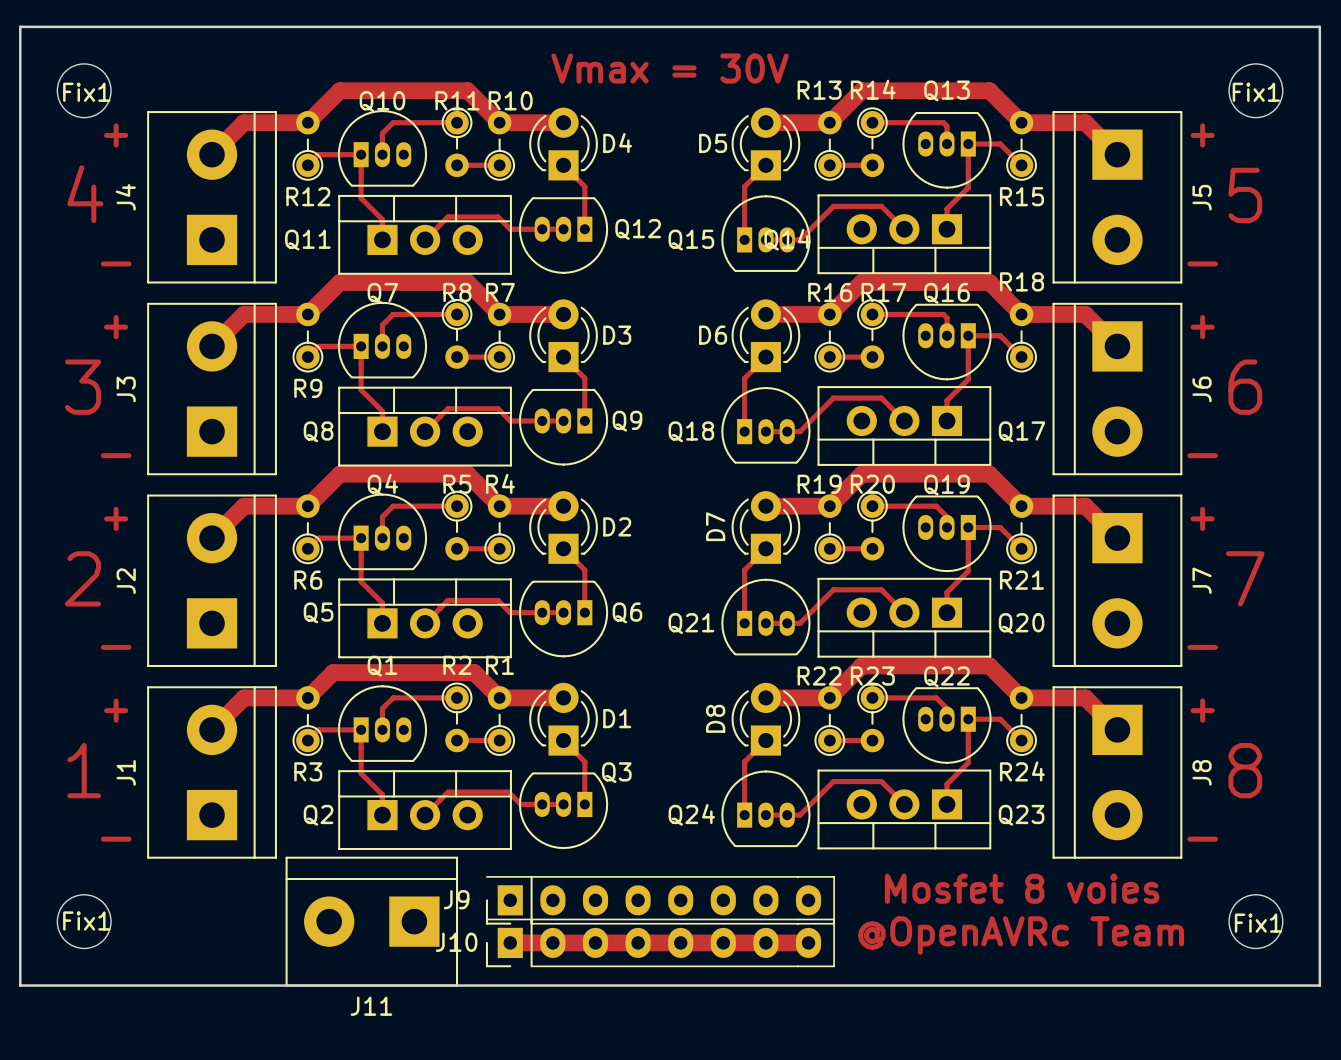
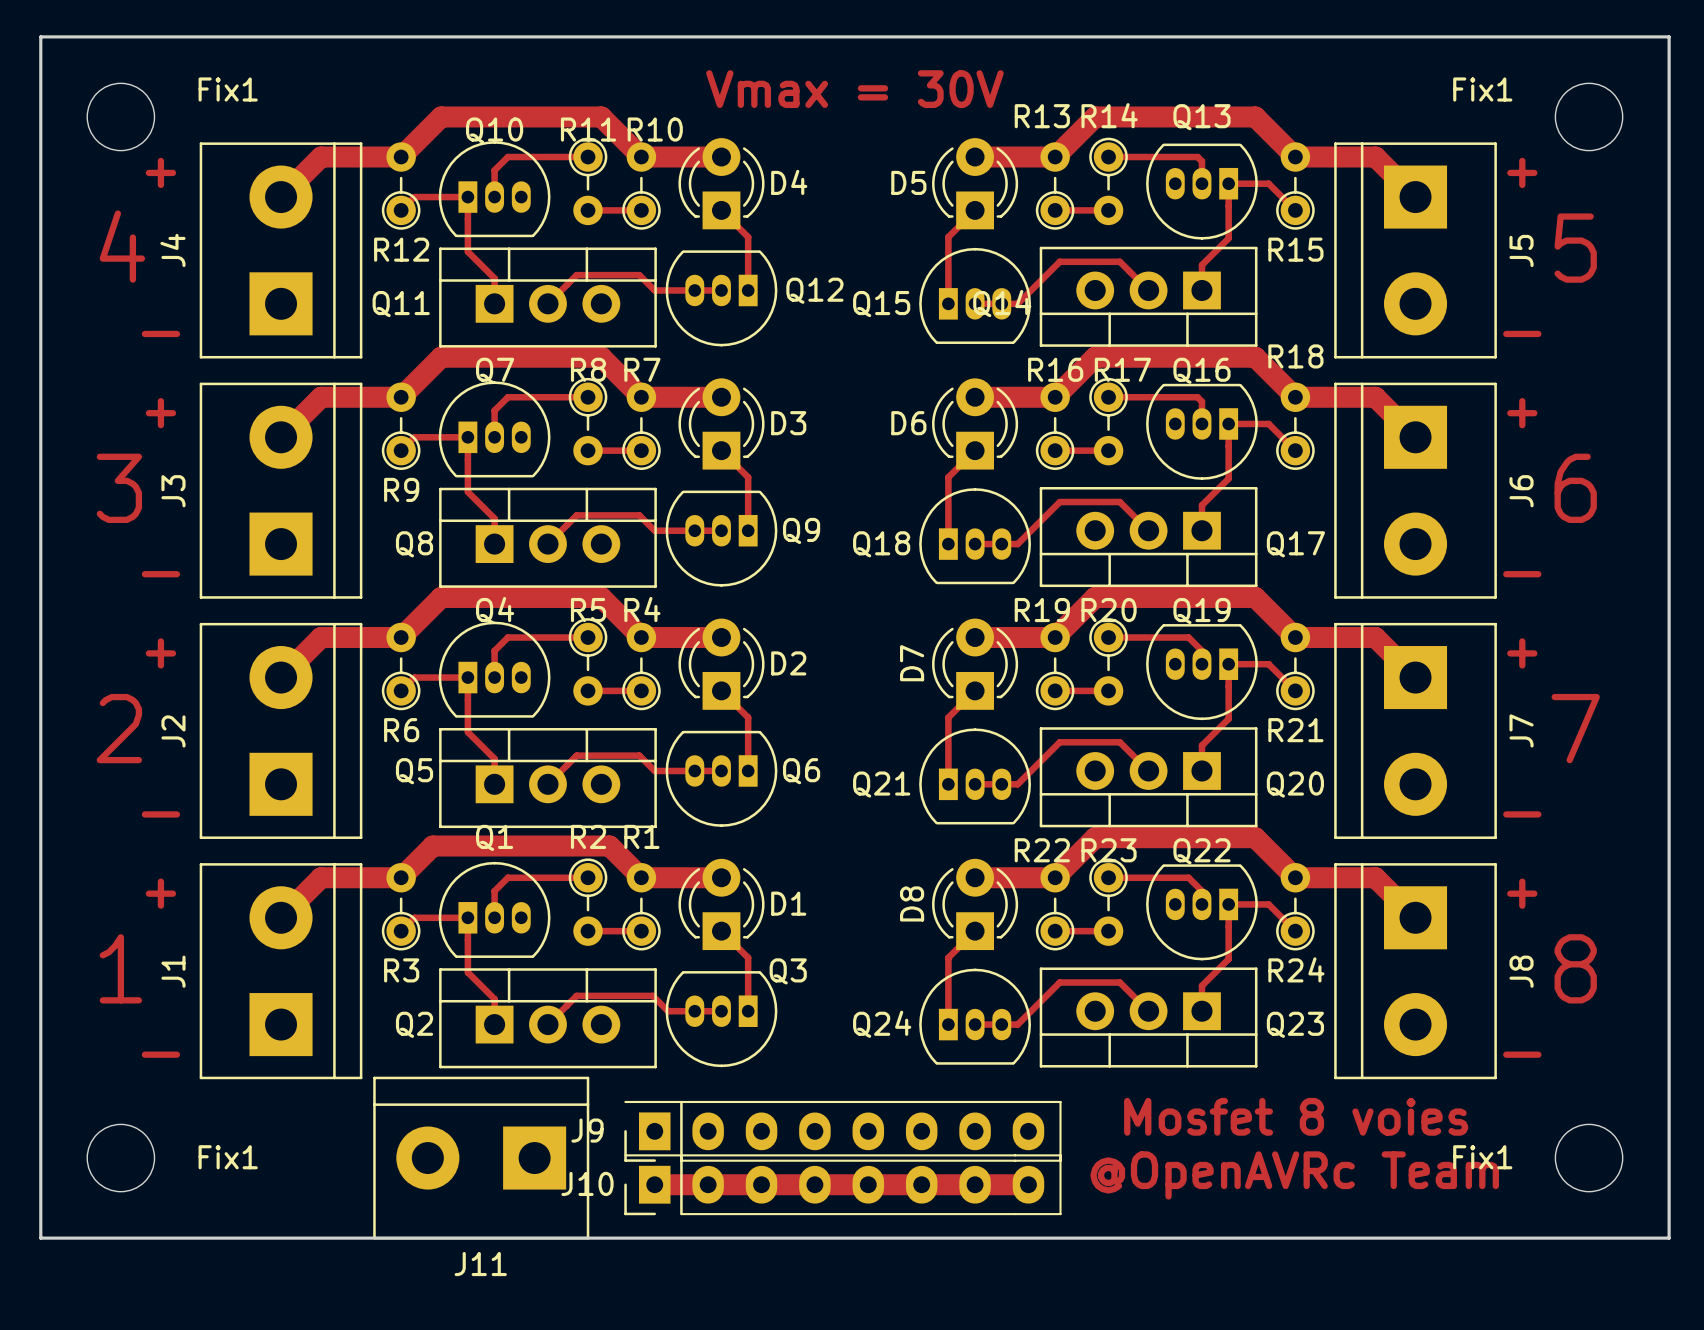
Fix1 name position: Fix1 (86, 92) -> Fix1 (228, 89)
Fix1 name position: Fix1 (1256, 92) -> Fix1 (1482, 89)
Fix1 name position: Fix1 (86, 920) -> Fix1 (228, 1157)
Fix1 name position: Fix1 (1258, 923) -> Fix1 (1482, 1157)

